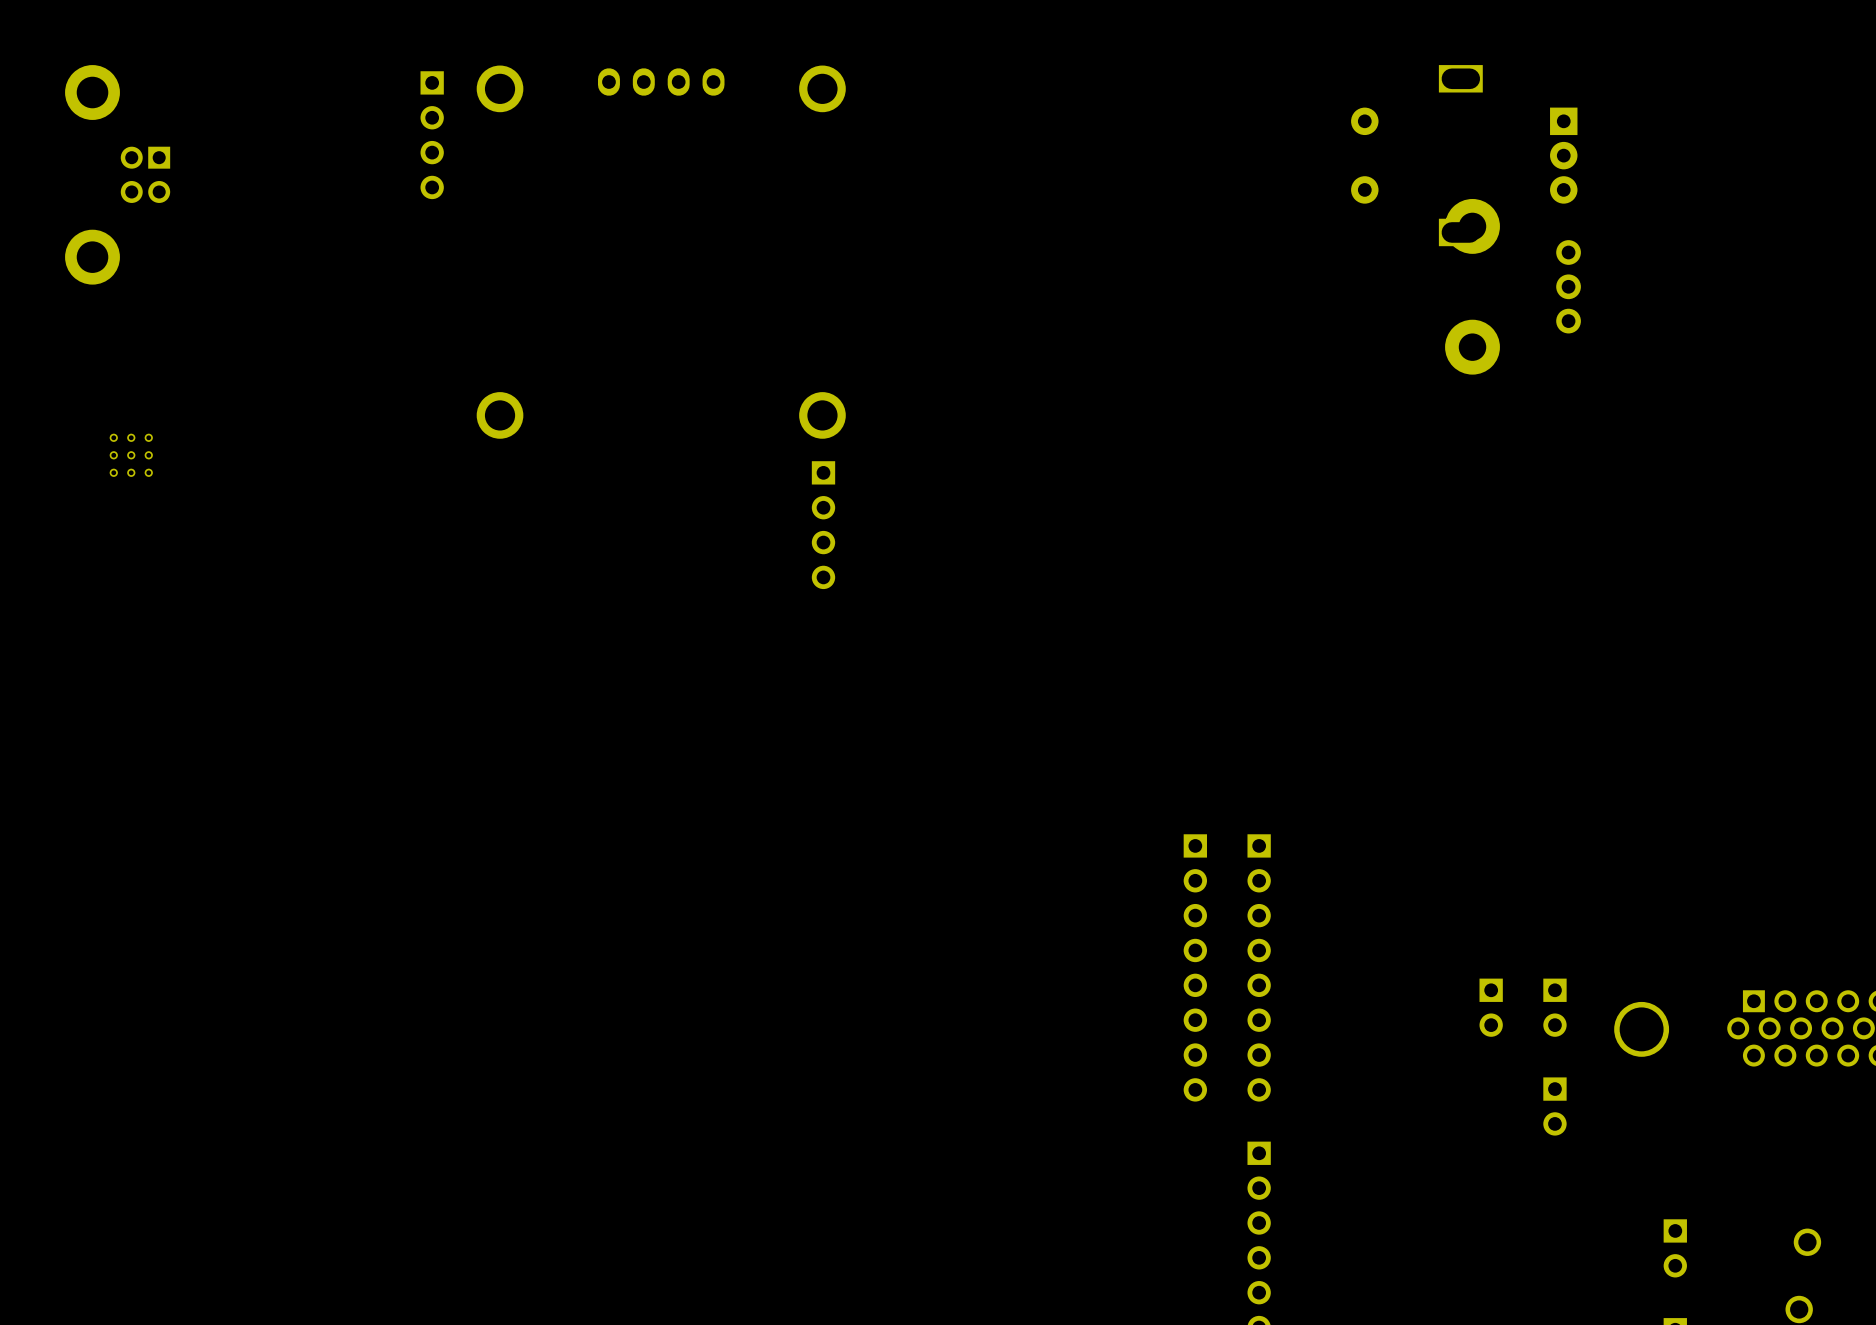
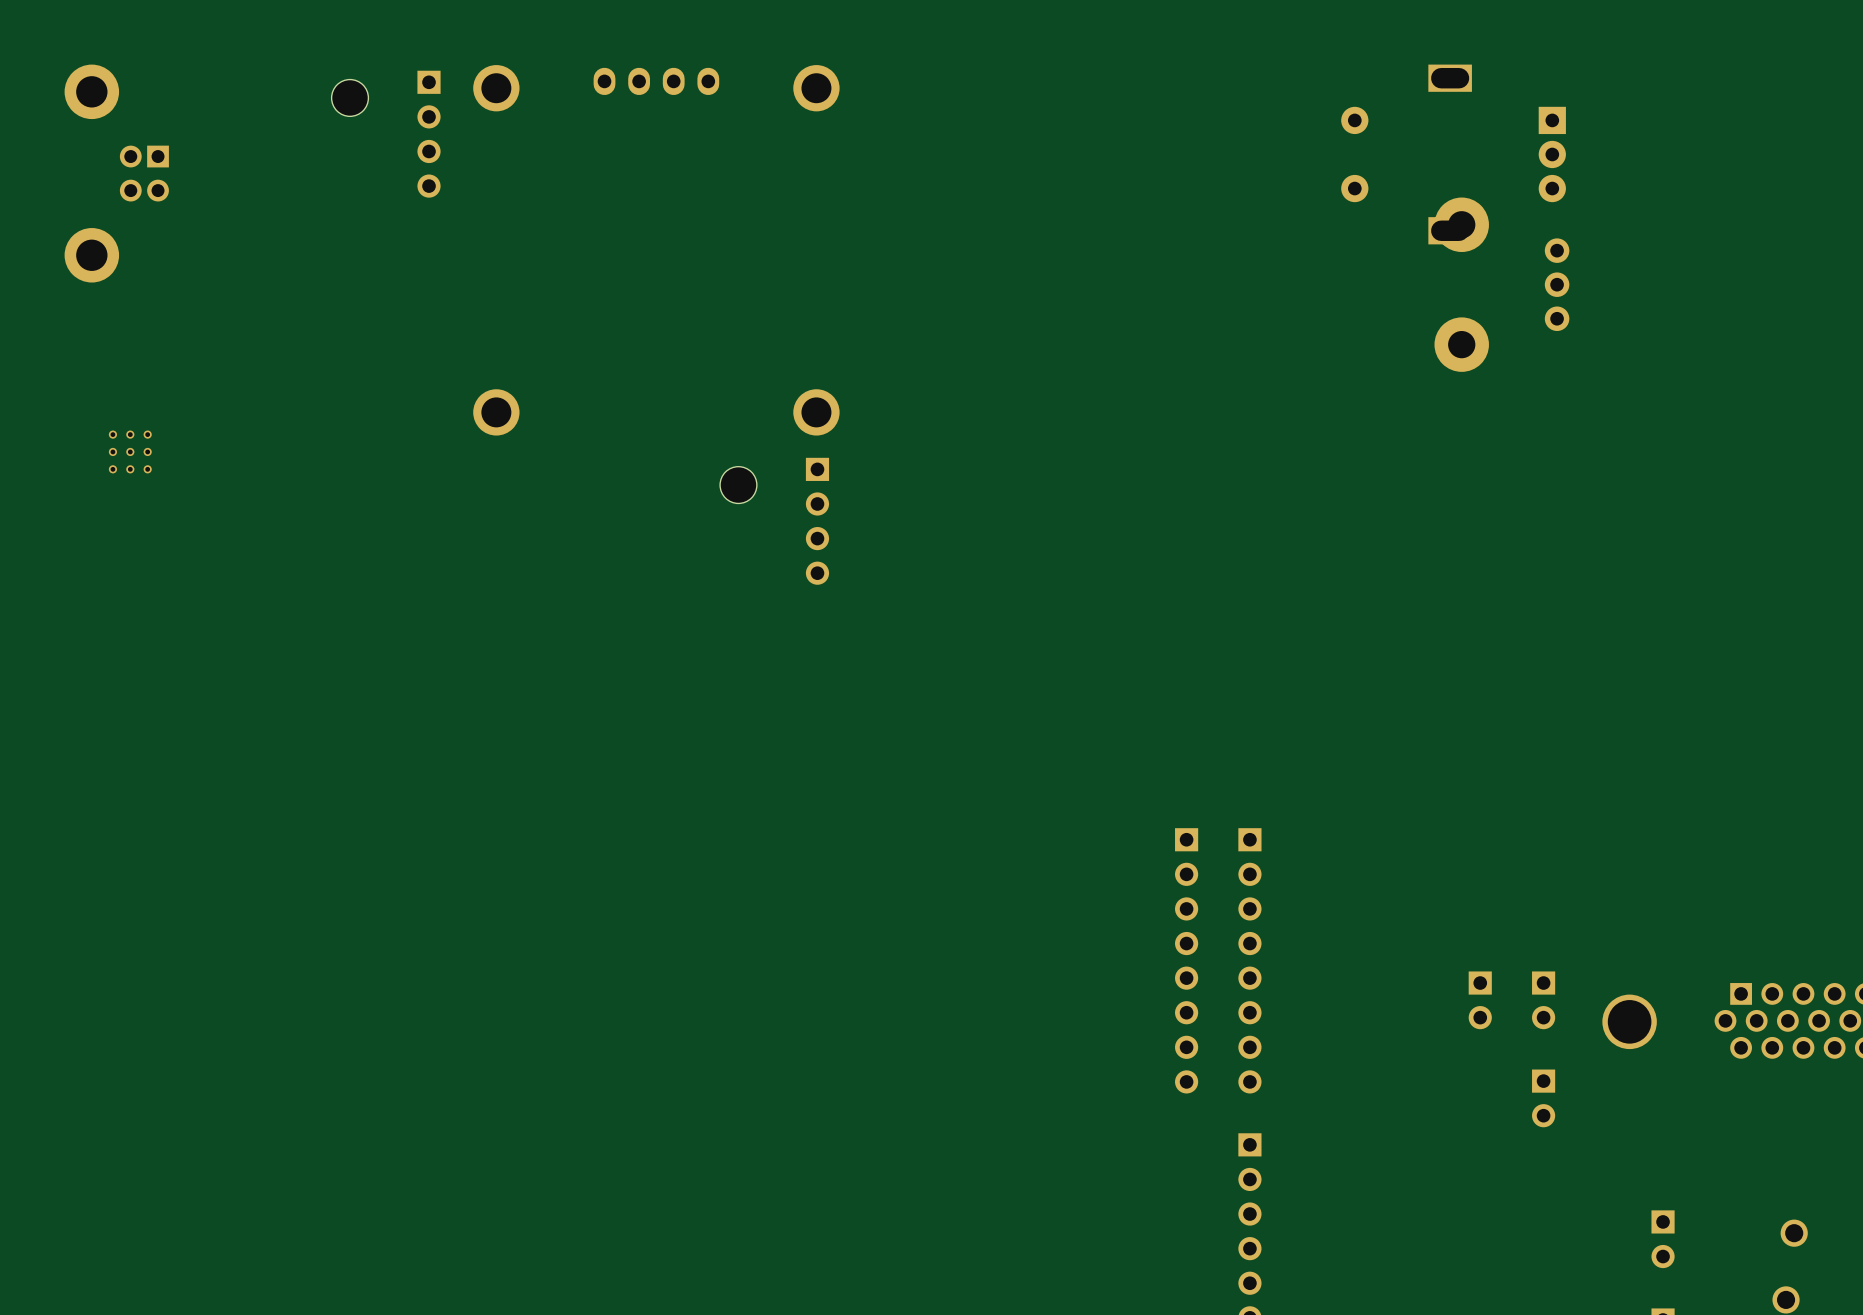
part: none -> (350, 97)
part: none -> (738, 485)

